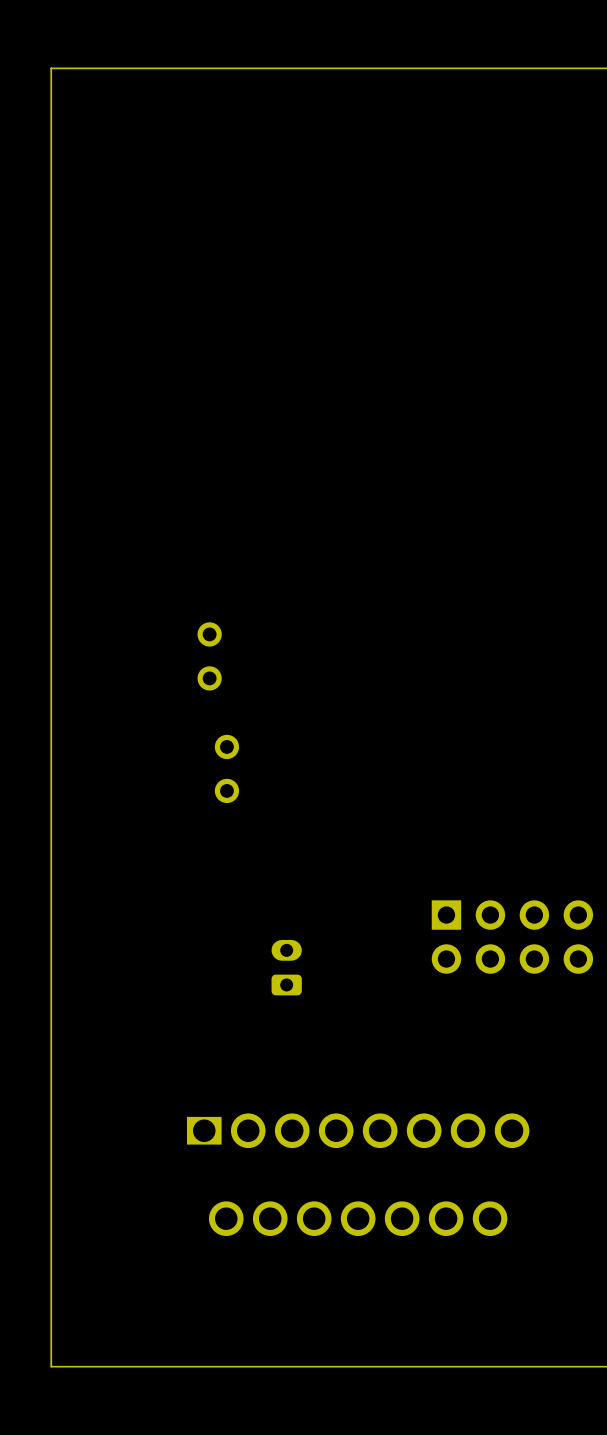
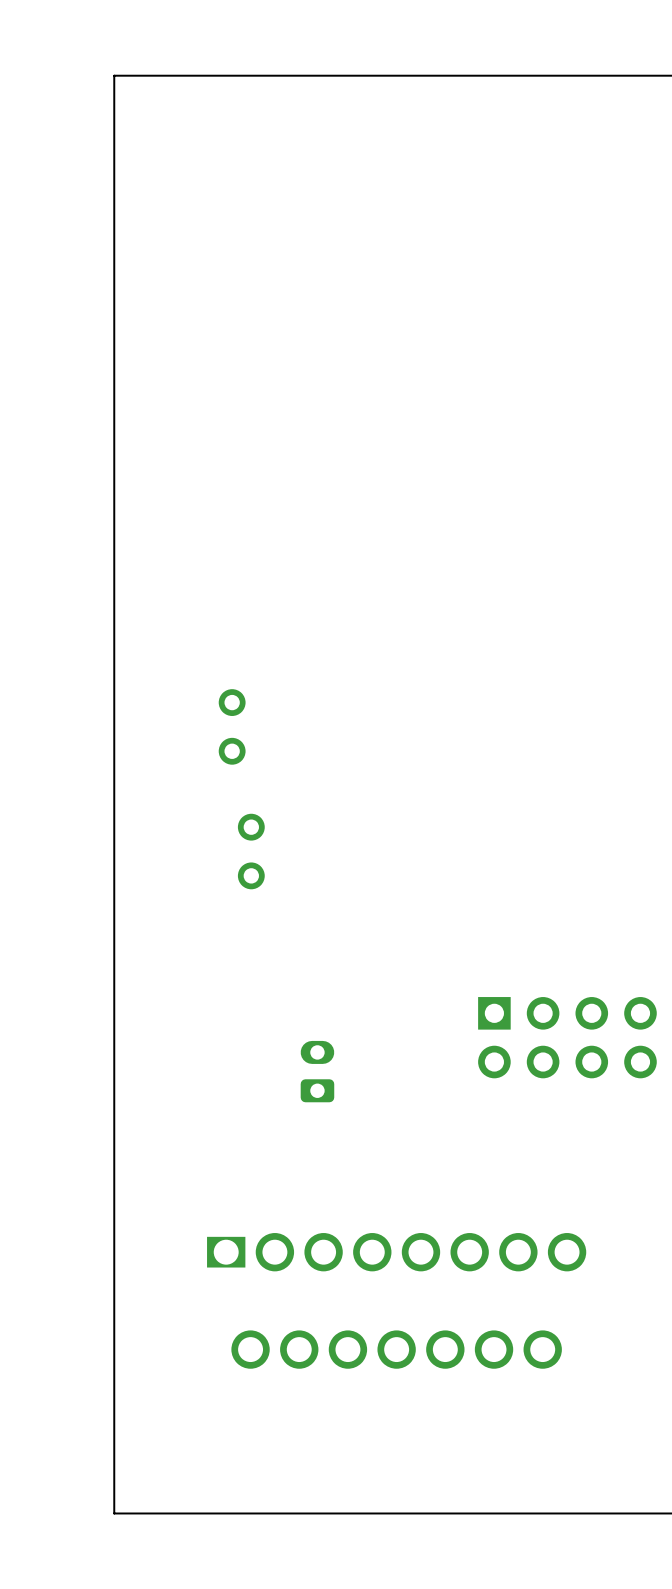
board edge: (103, 68) (51, 68) (51, 1366) (103, 1366) -> (114, 75) (114, 1513)

